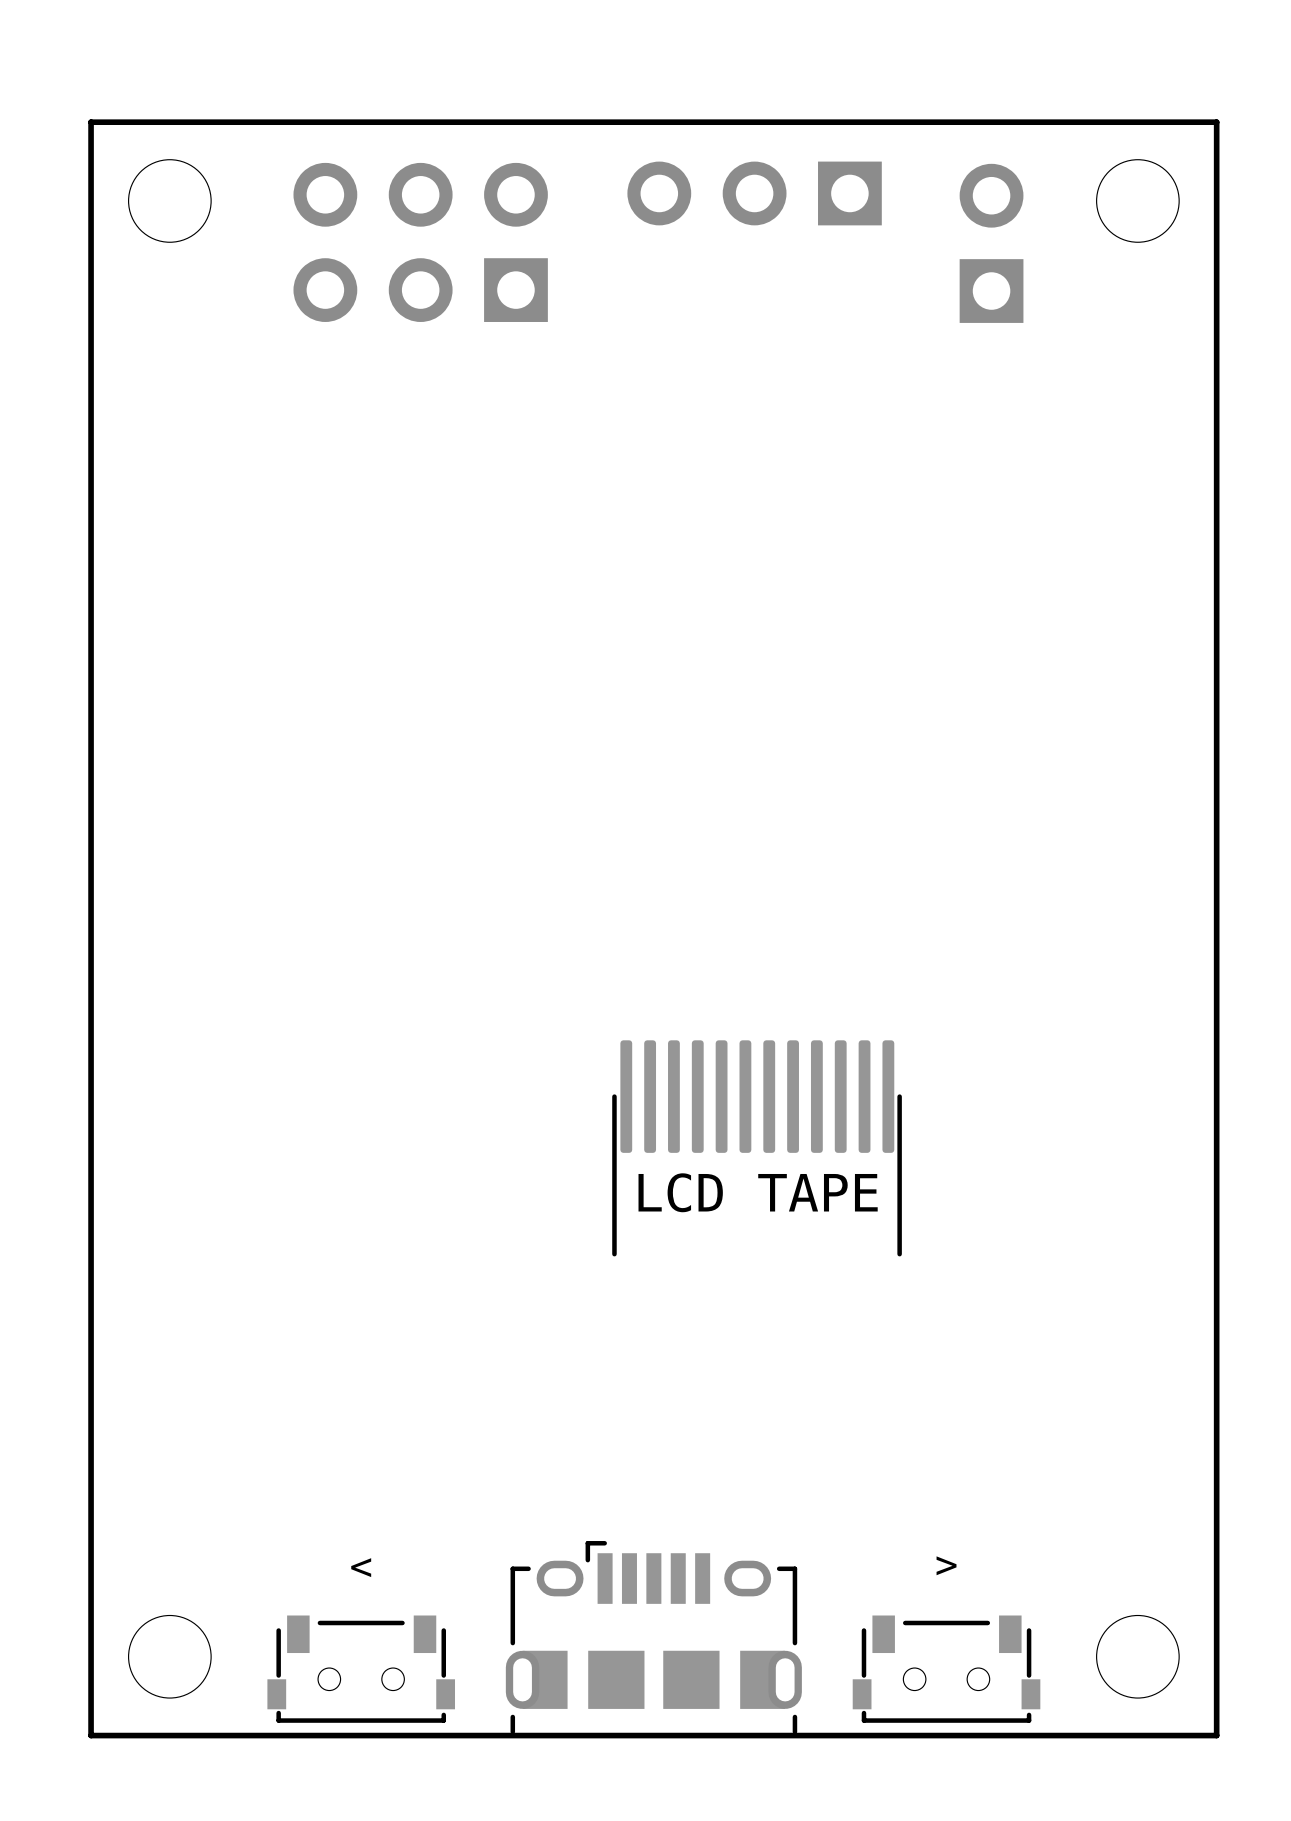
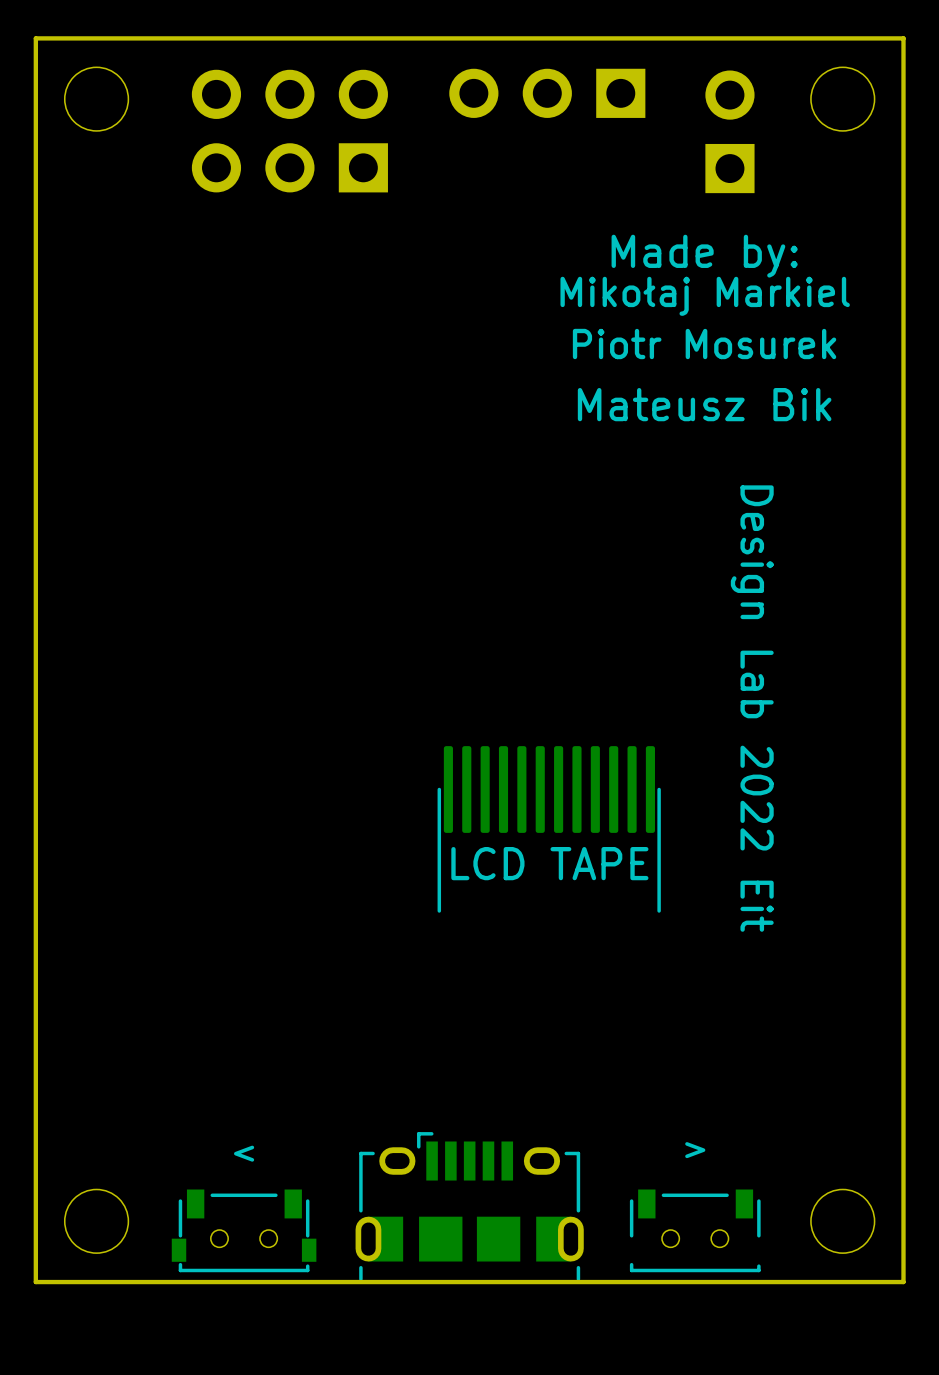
text: none -> Made by: (704, 256)
text: none -> Mikołaj Markiel (705, 296)
text: none -> Piotr Mosurek (704, 344)
text: none -> Mateusz Bik (704, 404)
text: none -> Design Lab 2022 Eit (752, 708)
part footprint: [852, 1615, 1041, 1723] -> [629, 1189, 761, 1273]

